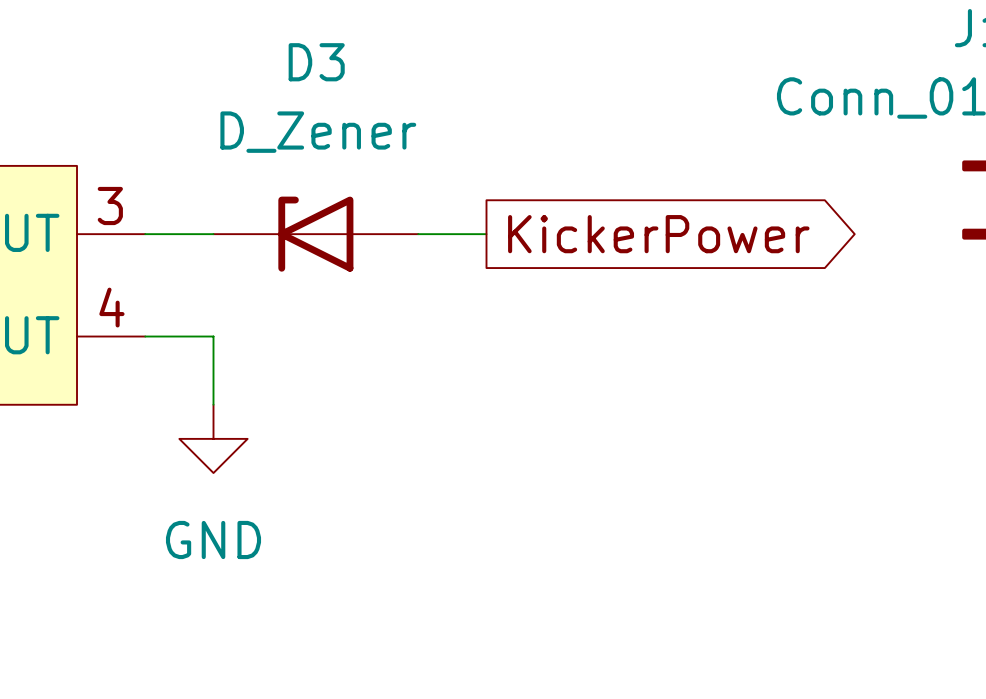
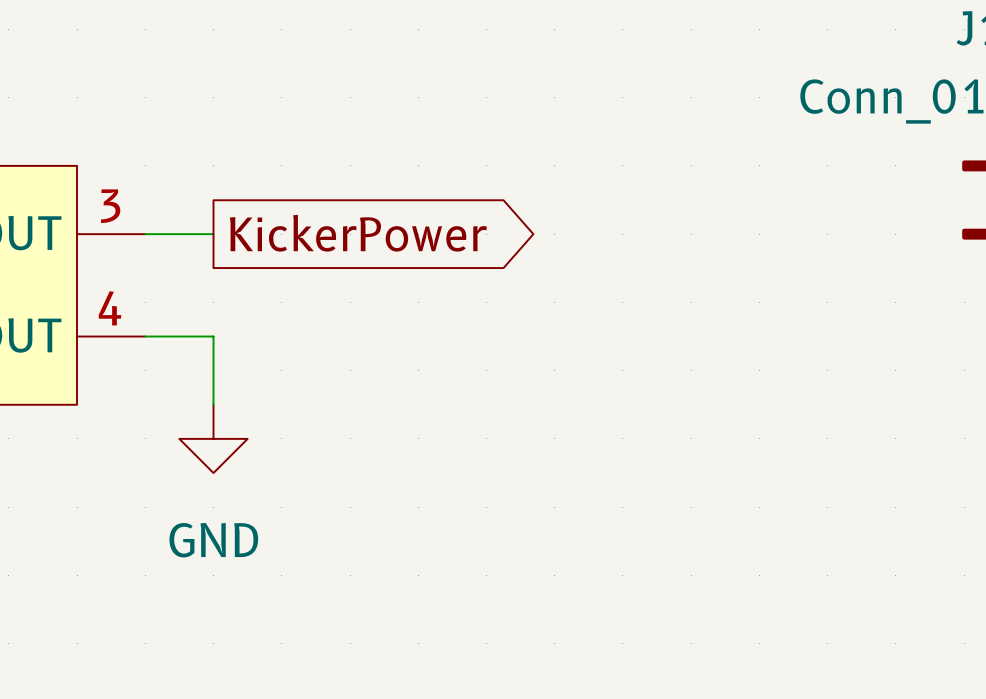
D3: D_Zener (315, 234) -> none
wire: (418, 234) (486, 234) -> none
global label position: KickerPower (658, 234) -> KickerPower (358, 233)

